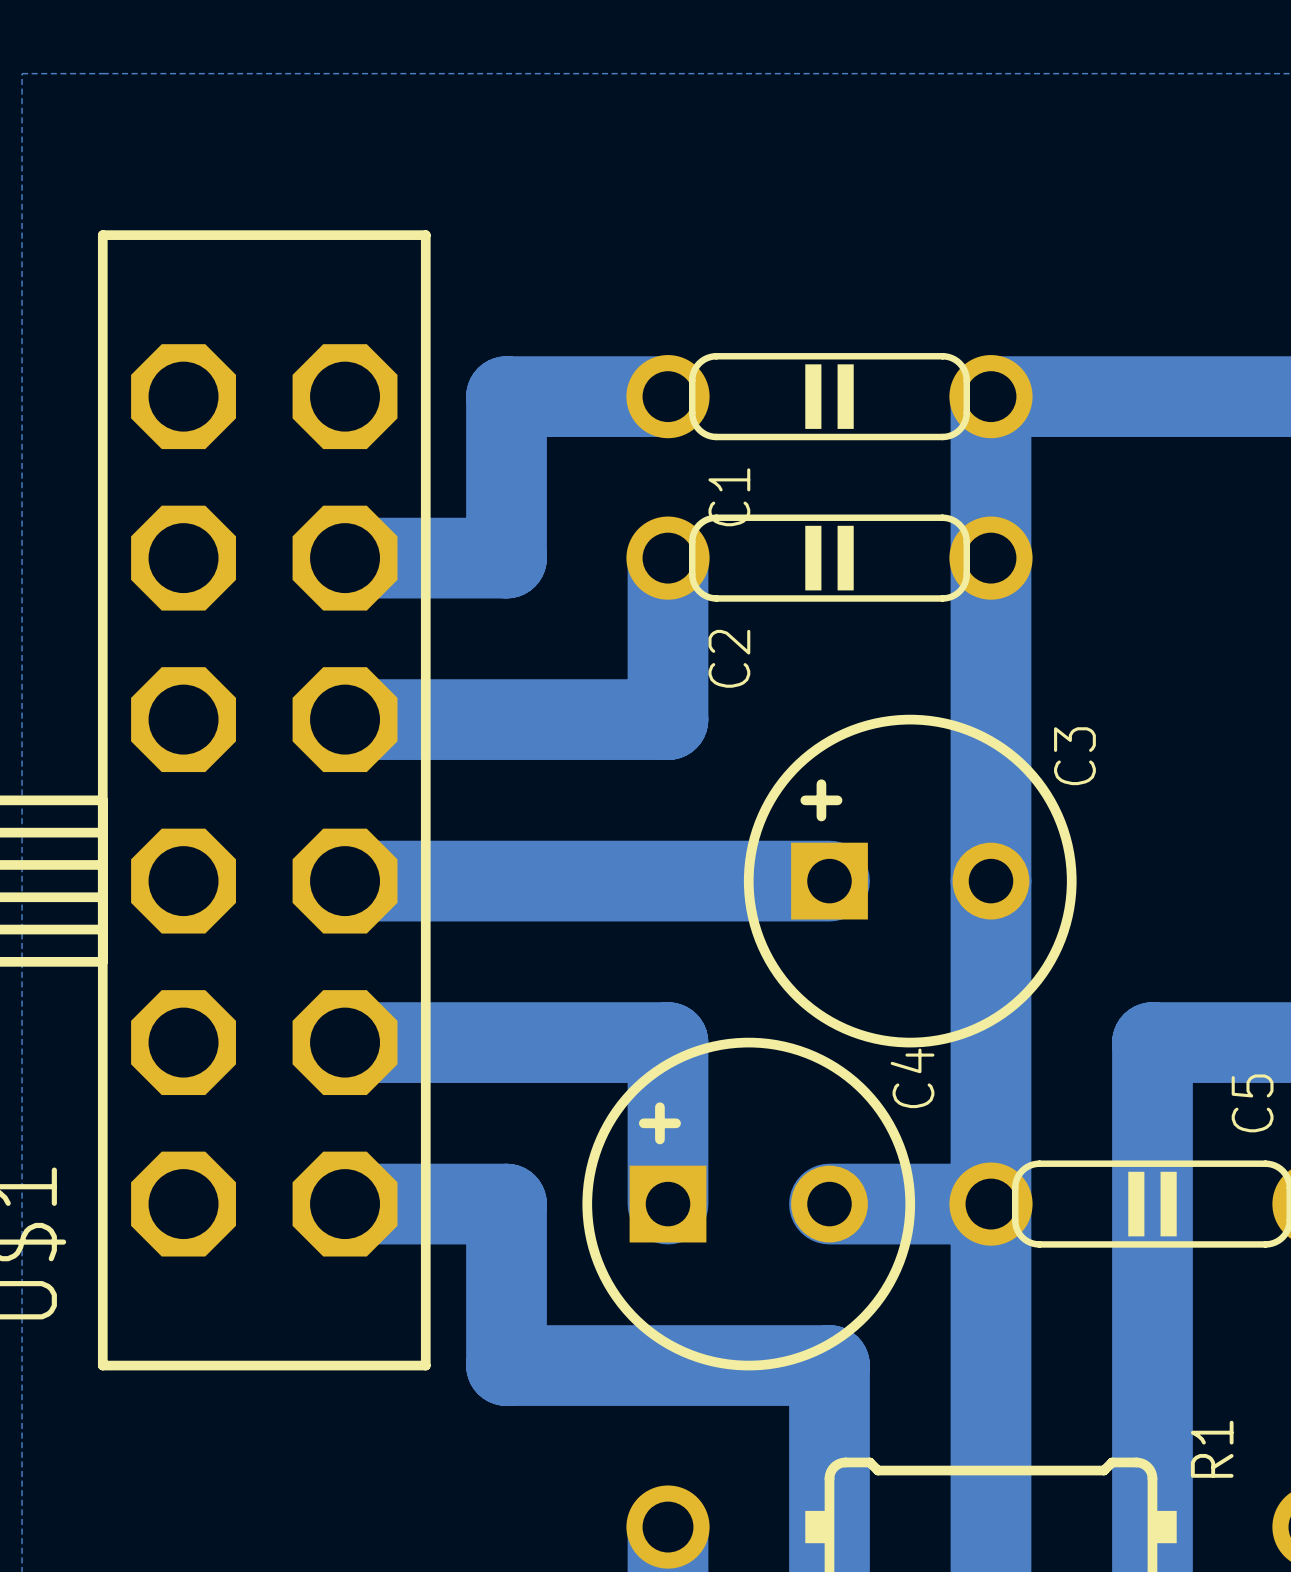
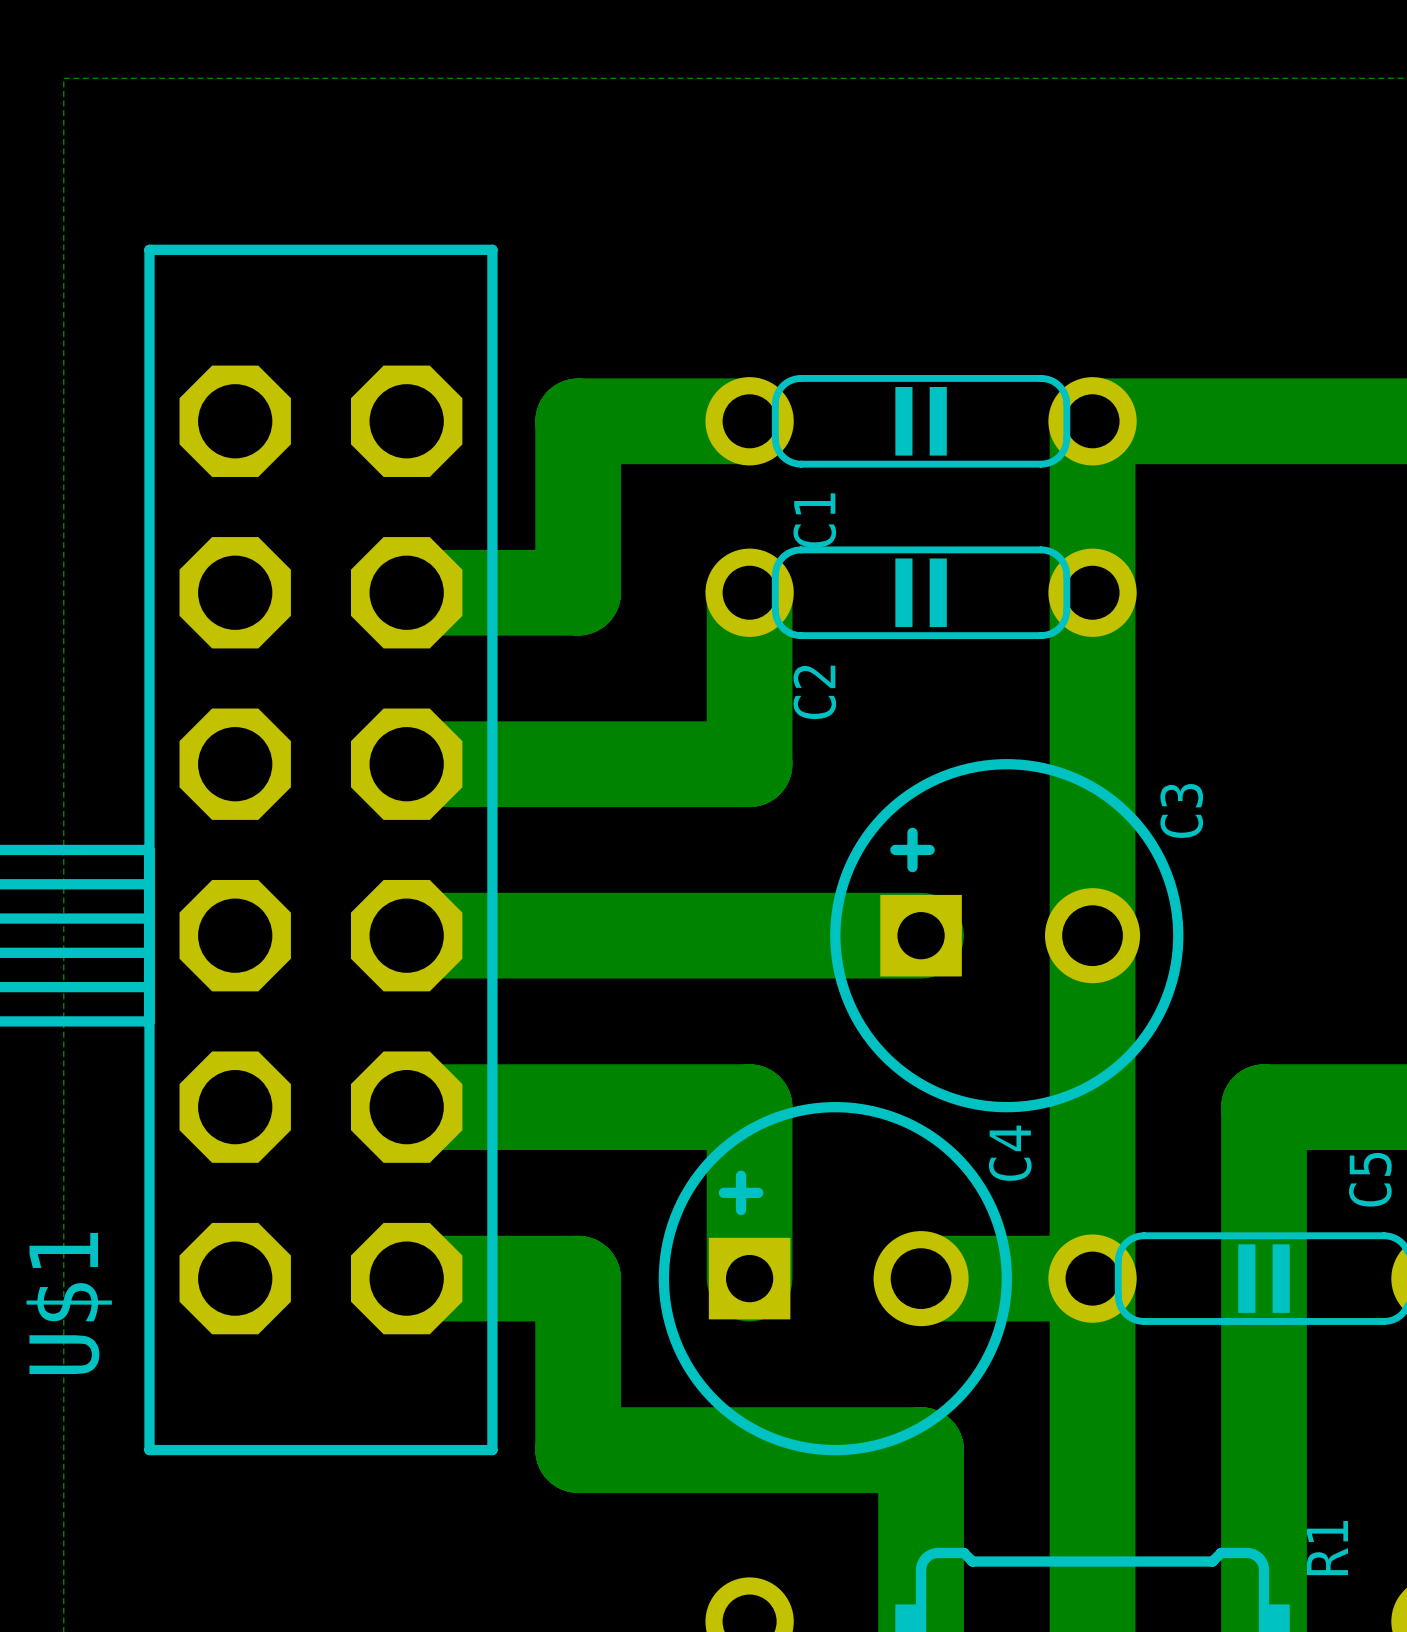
C3 footprint: [743, 714, 1077, 1048] -> [830, 759, 1184, 1113]
C4 footprint: [582, 1037, 916, 1371] -> [658, 1102, 1012, 1456]

